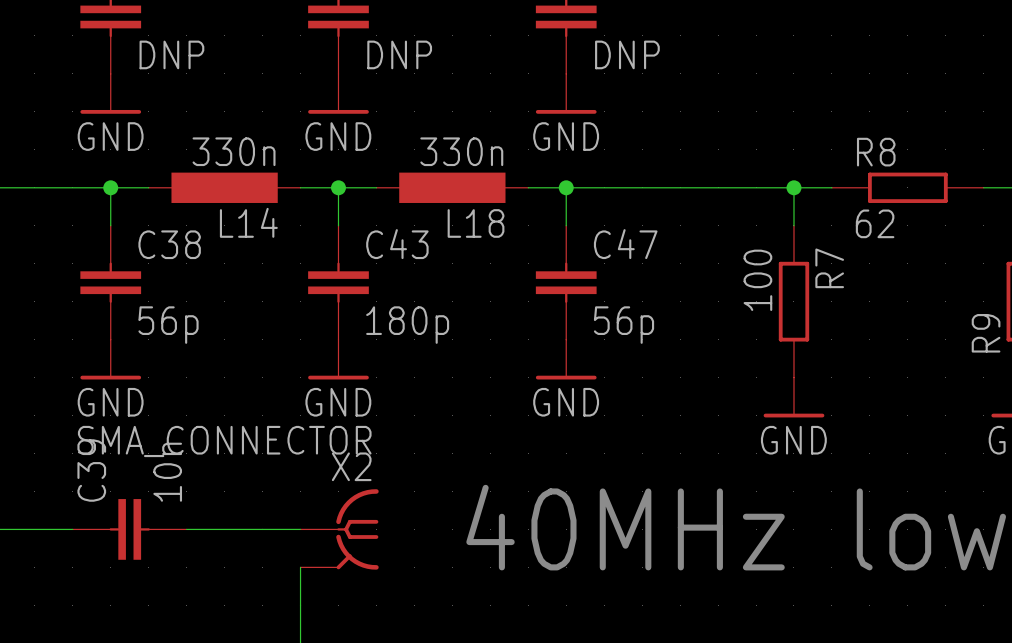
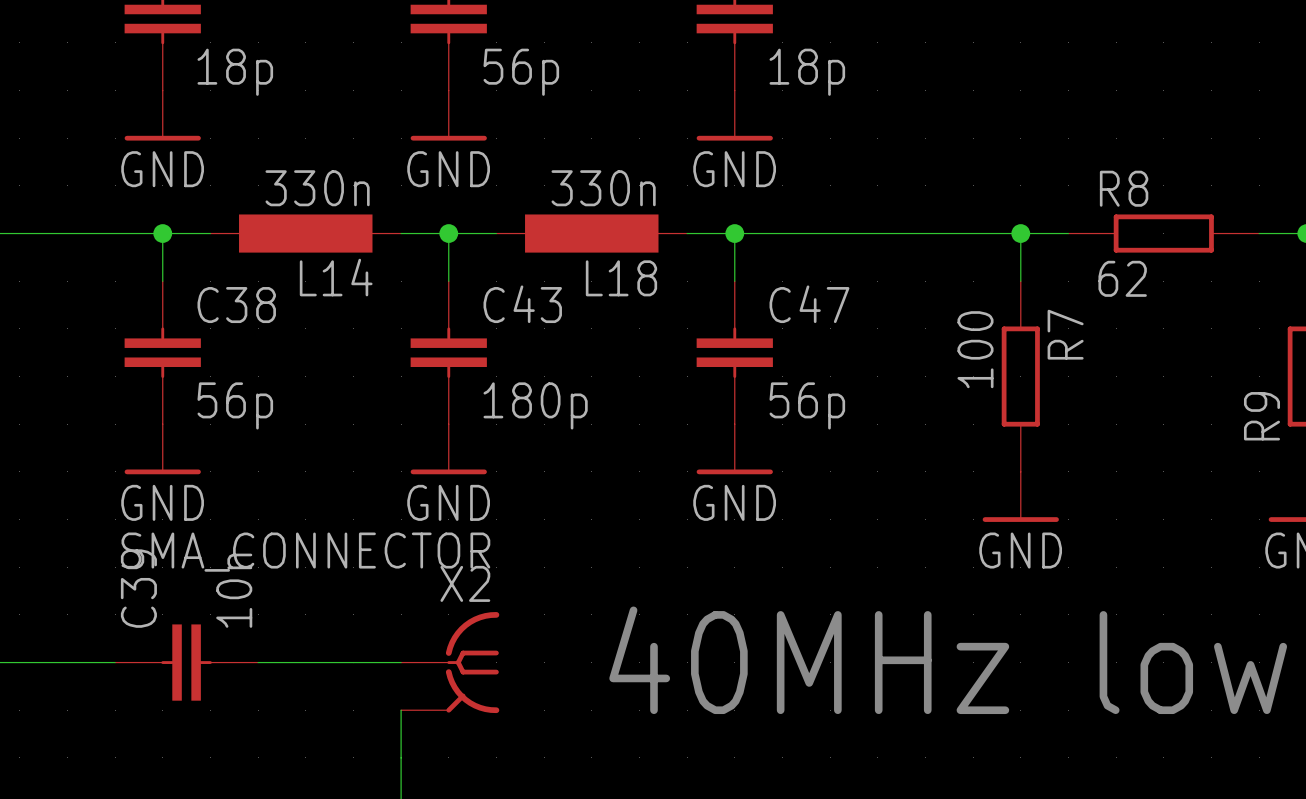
part value: DNP (171, 54) -> 18p (235, 72)
part value: DNP (399, 54) -> 56p (521, 72)
part value: DNP (627, 54) -> 18p (807, 72)

